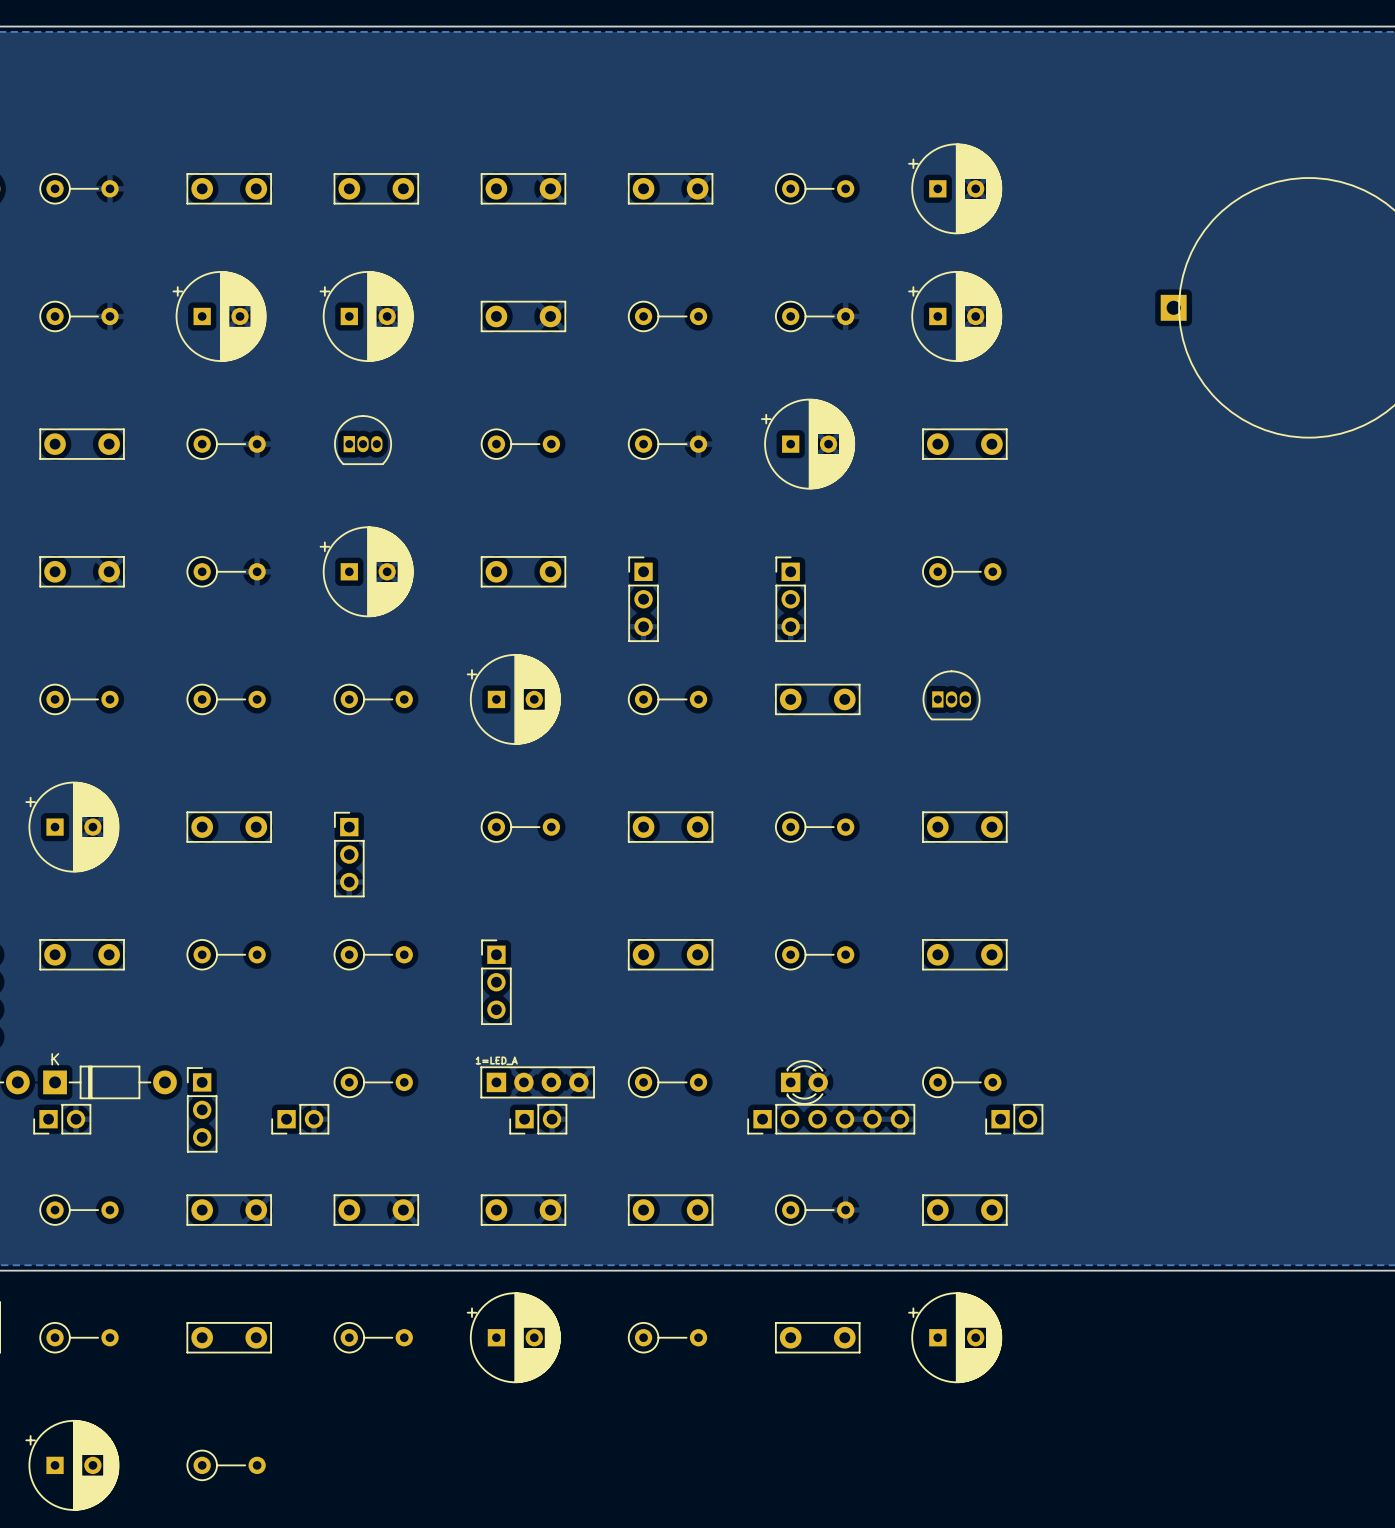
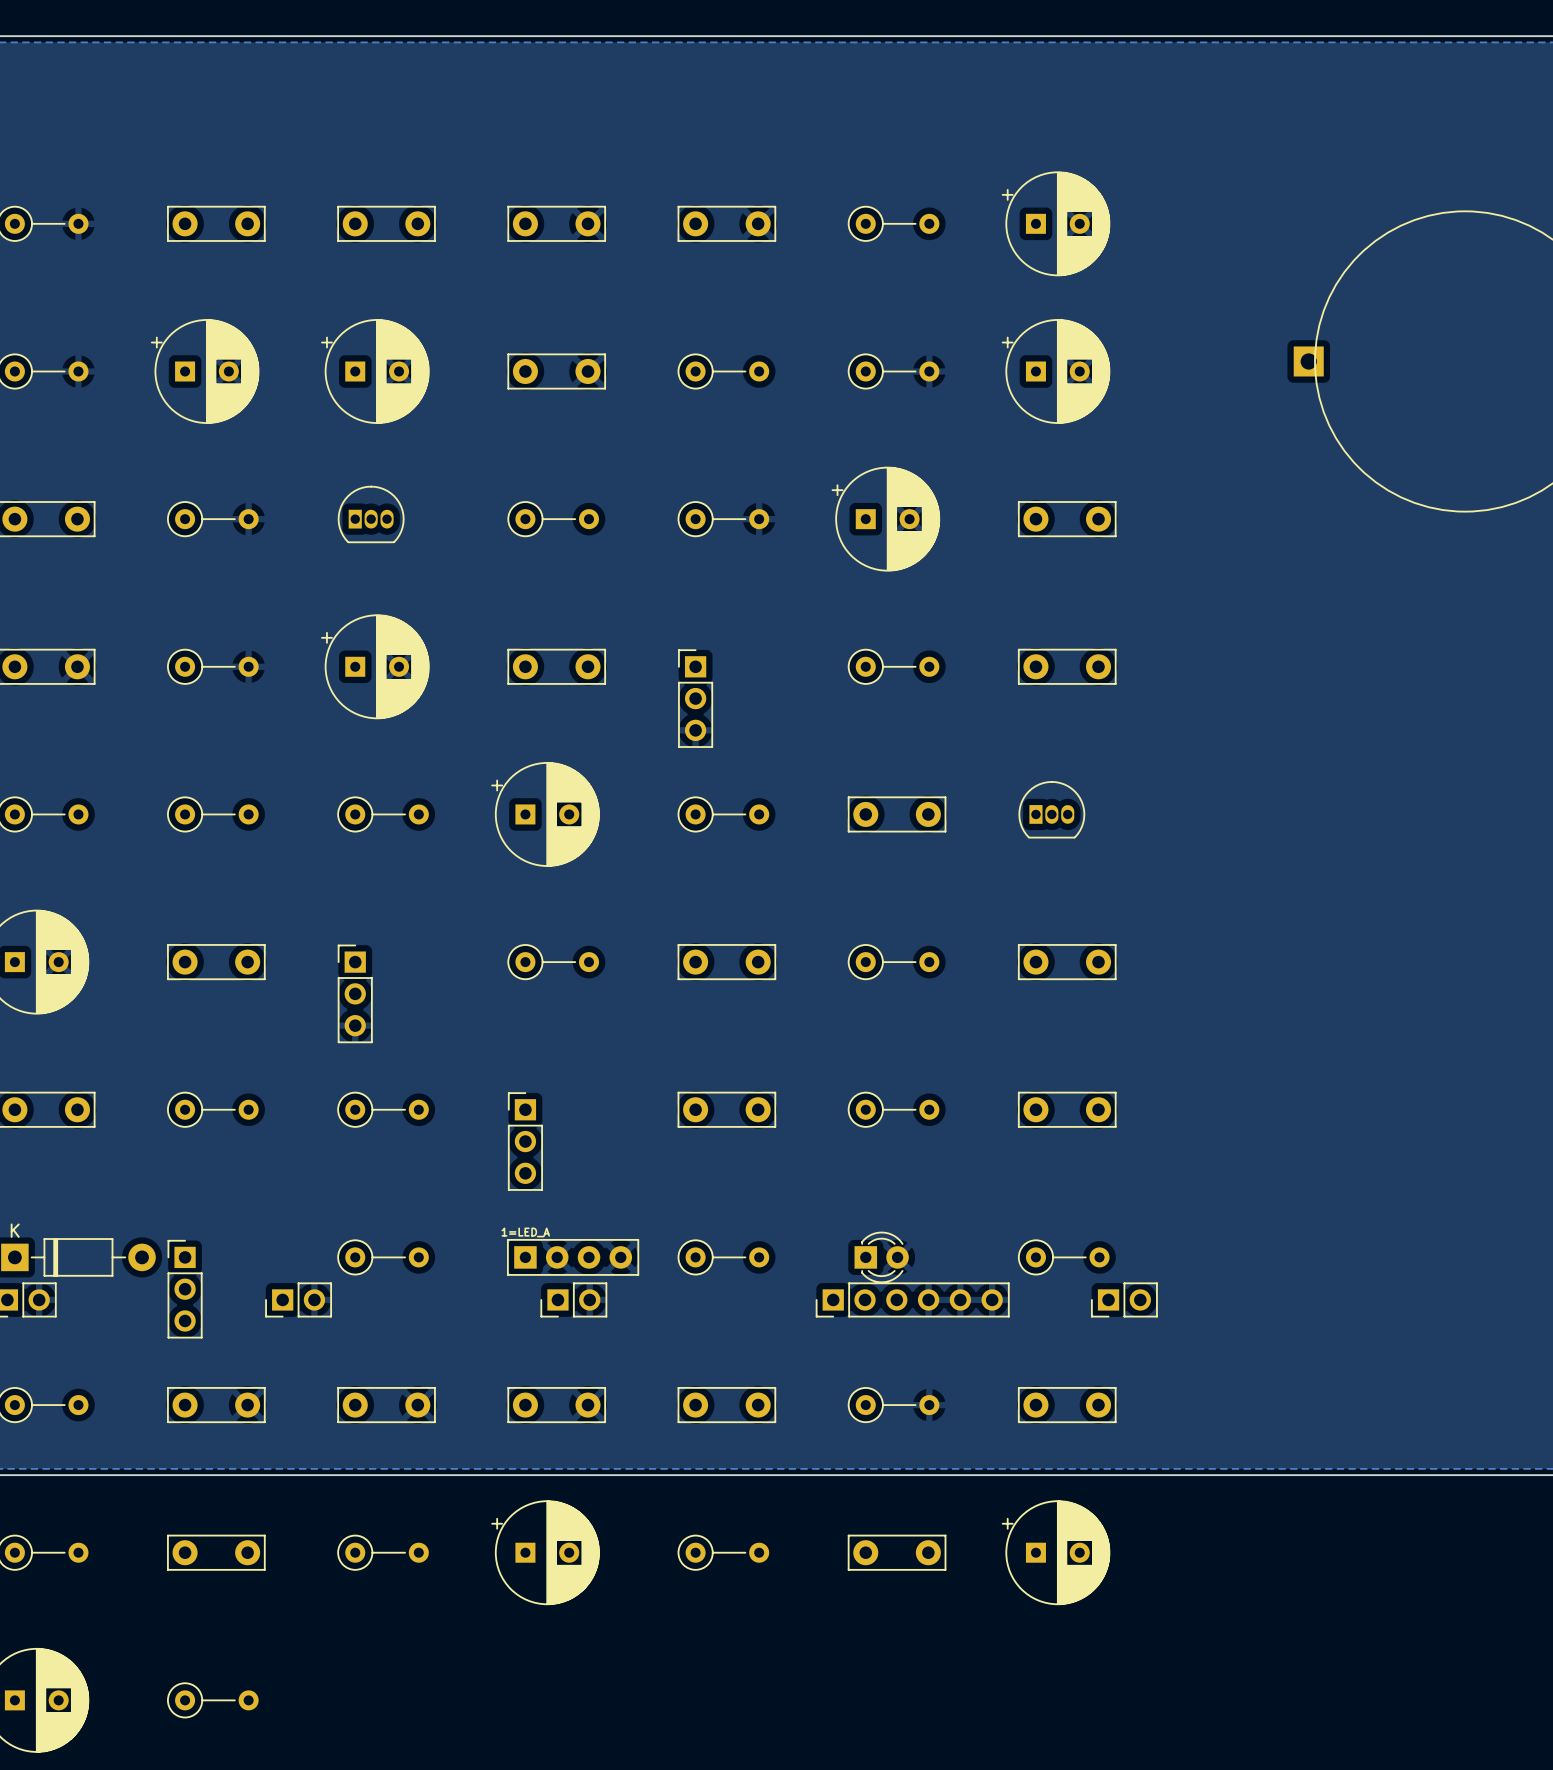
part footprint: [922, 556, 1002, 588] -> [1018, 648, 1117, 685]
part: none -> (893, 666)
part: (790, 599) -> none

